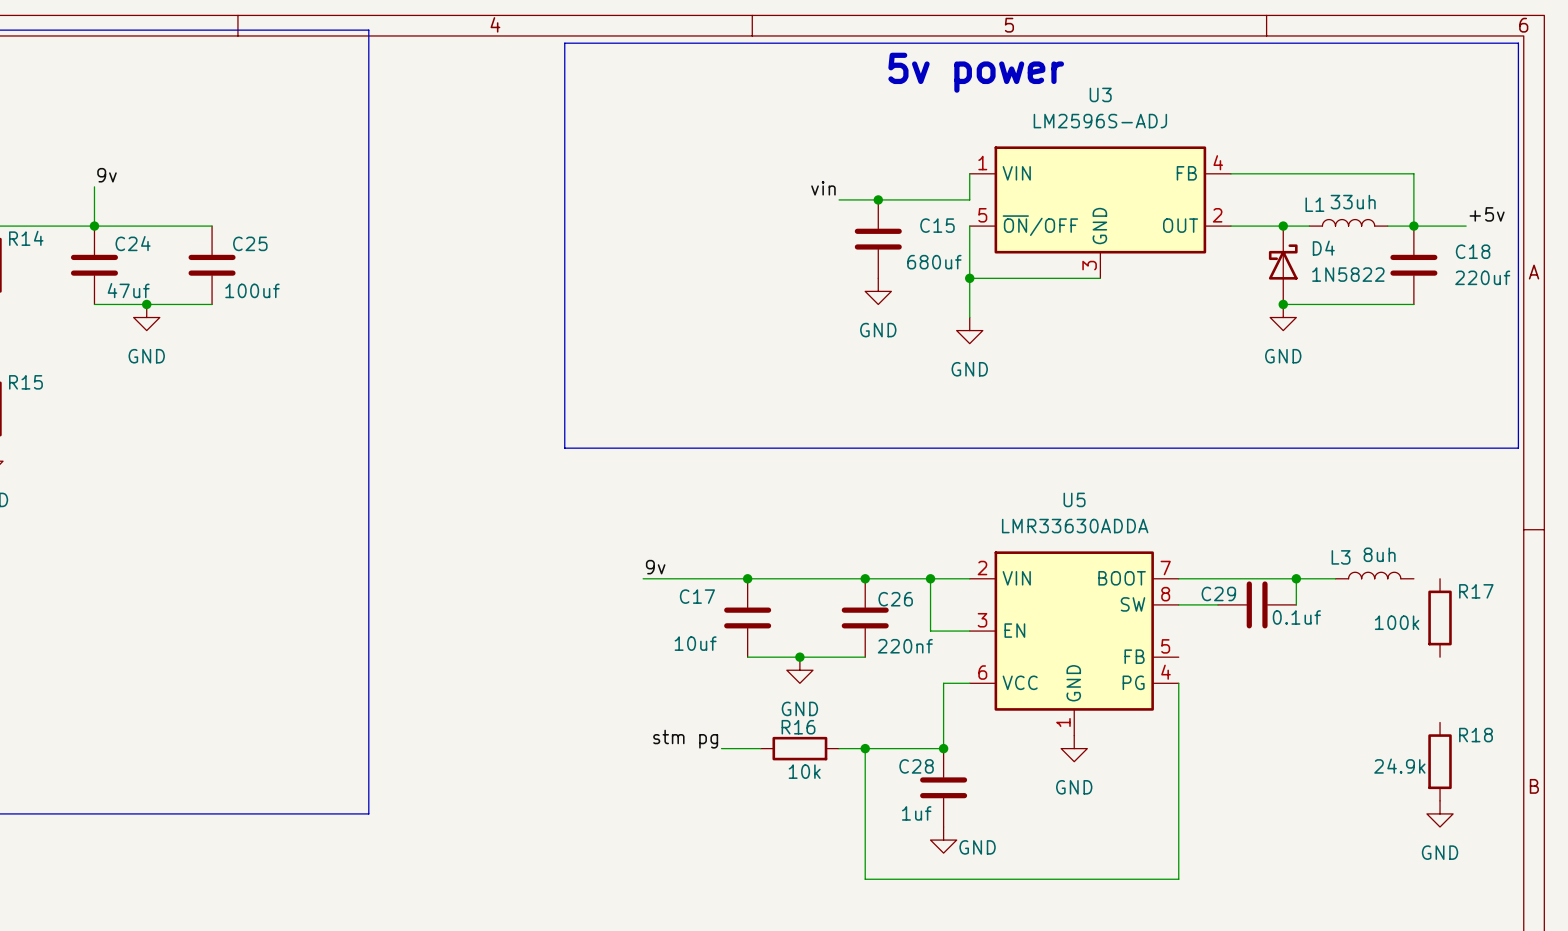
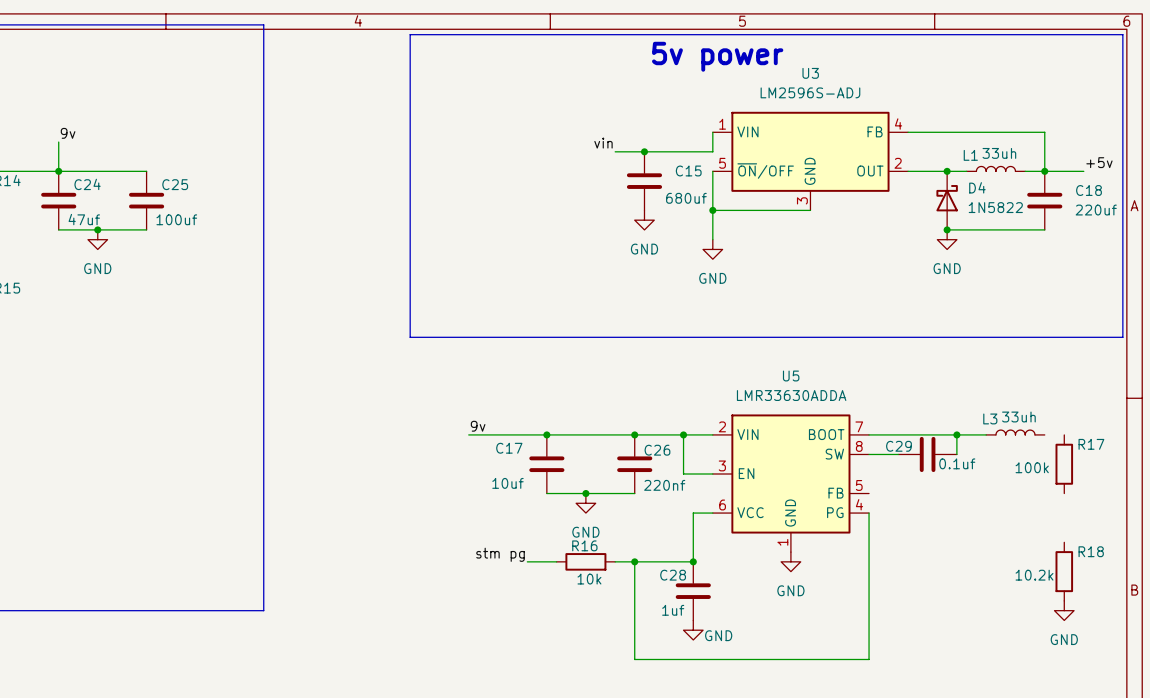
L3 value: 8uh (1379, 554) -> 33uh (1018, 417)
R18 value: 24.9k (1399, 766) -> 10.2k (1034, 575)

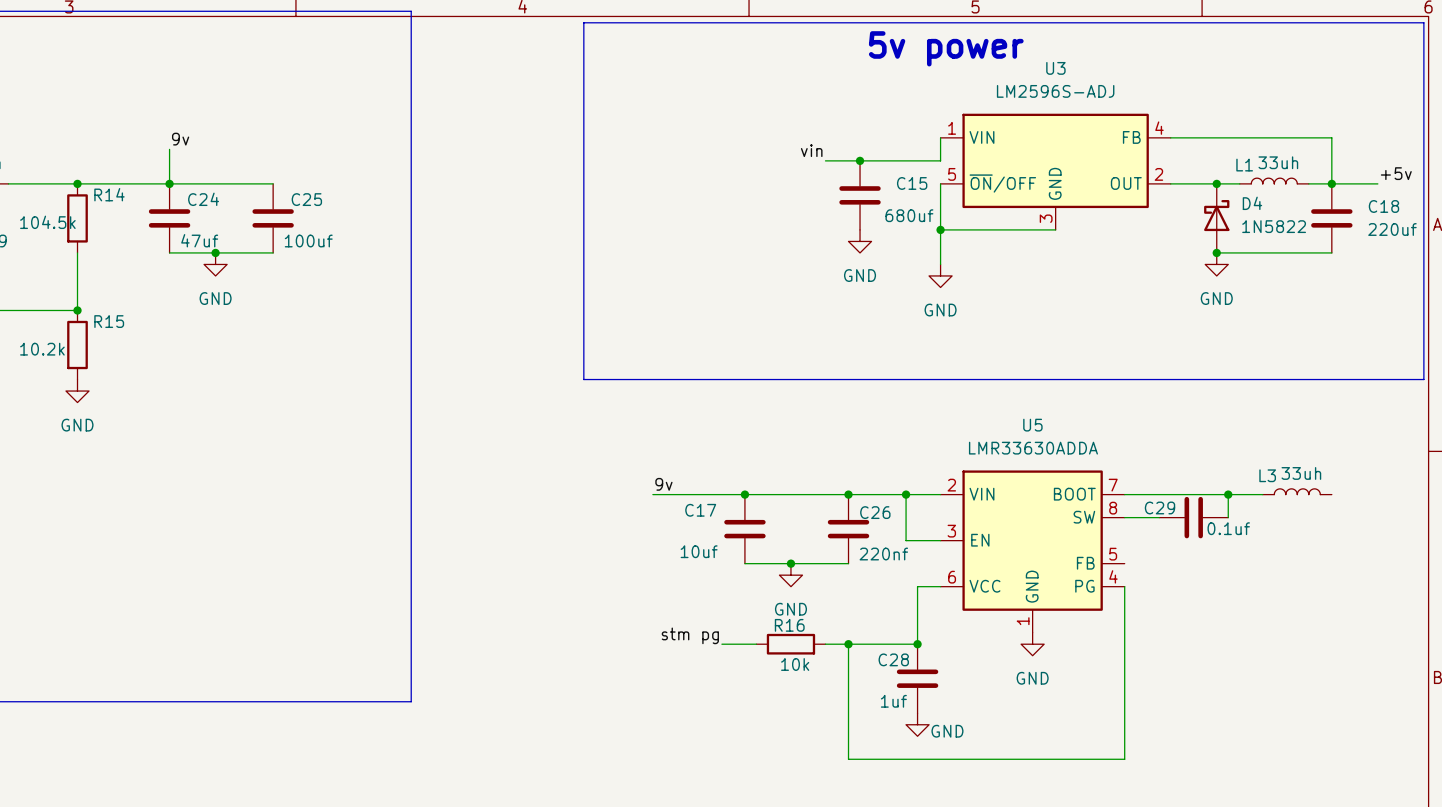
R17: 100k (1064, 464) -> none
R18: 10.2k (1064, 571) -> none
power symbol: GND (1064, 610) -> none

